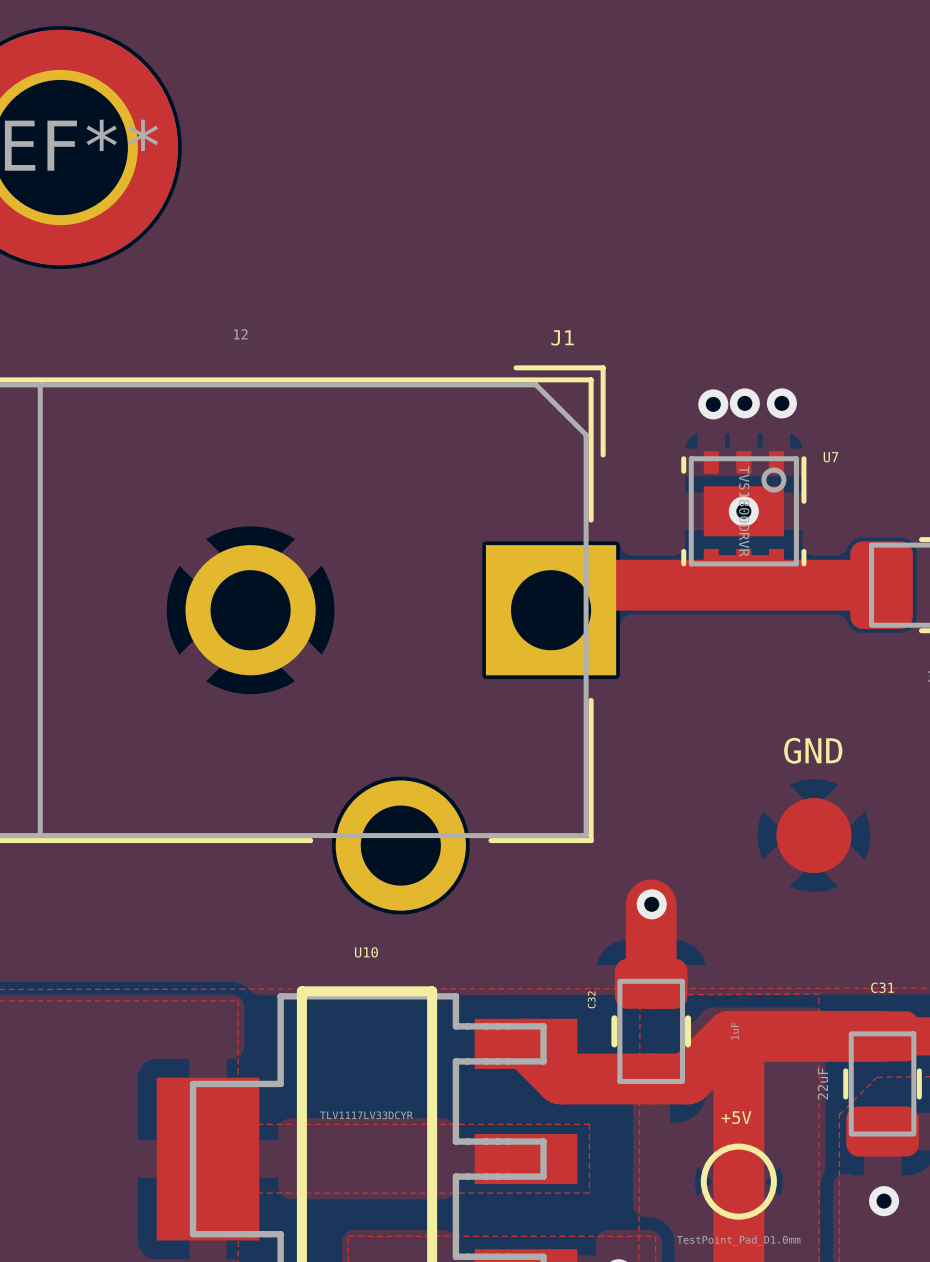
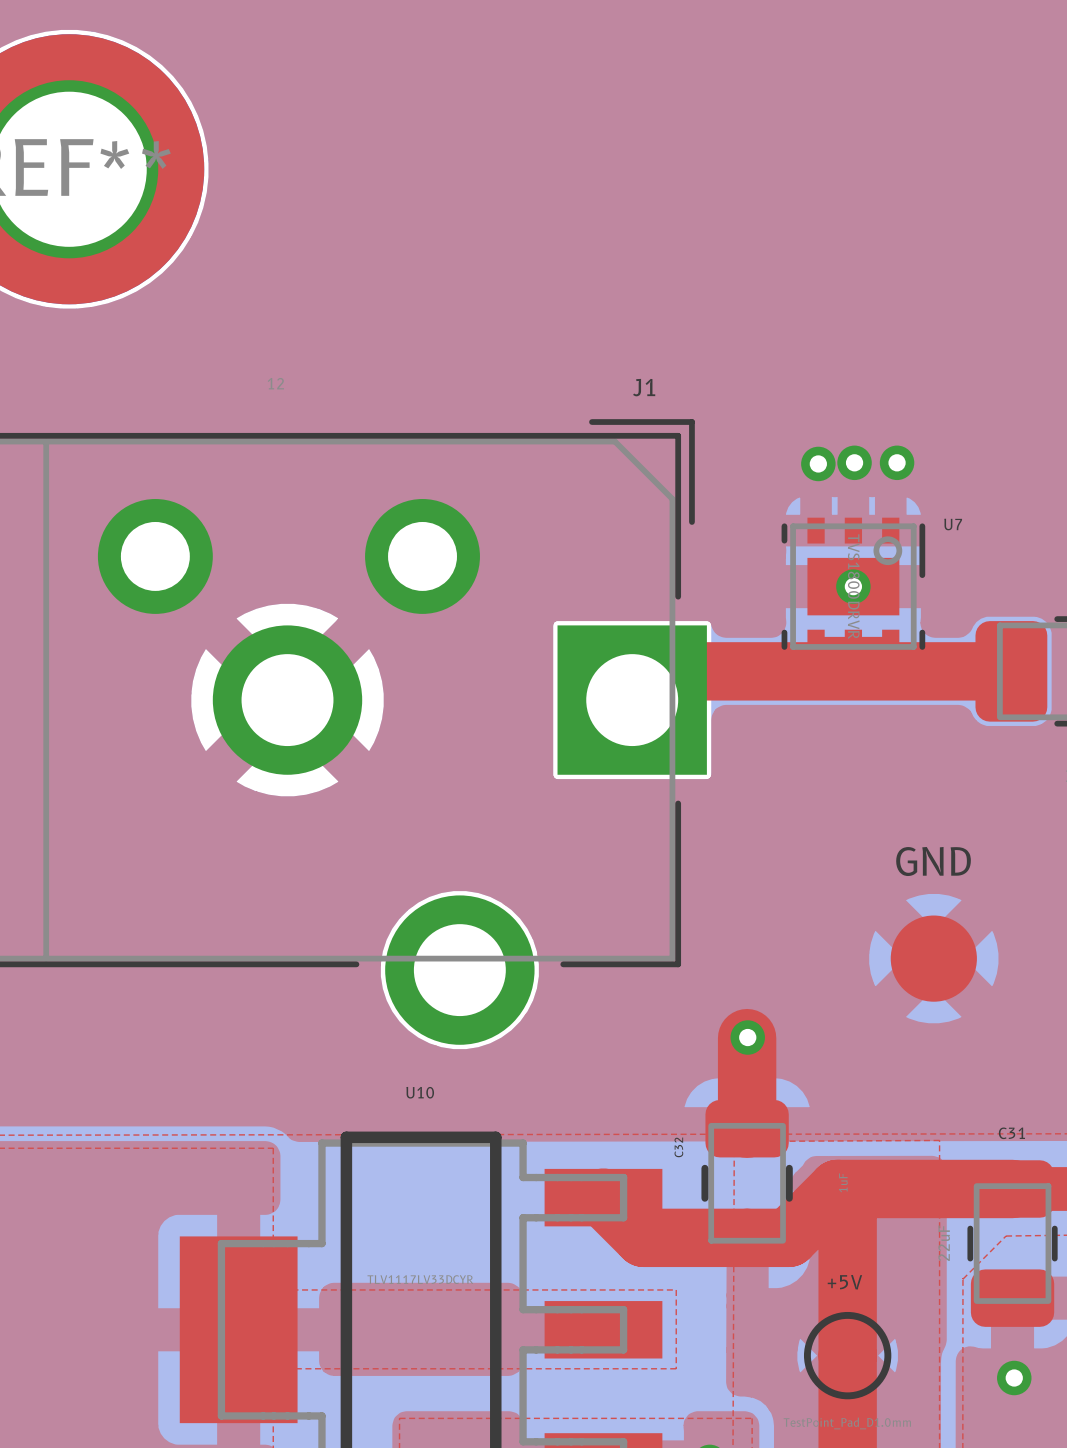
via: none -> (155, 556)
via: none -> (422, 556)

